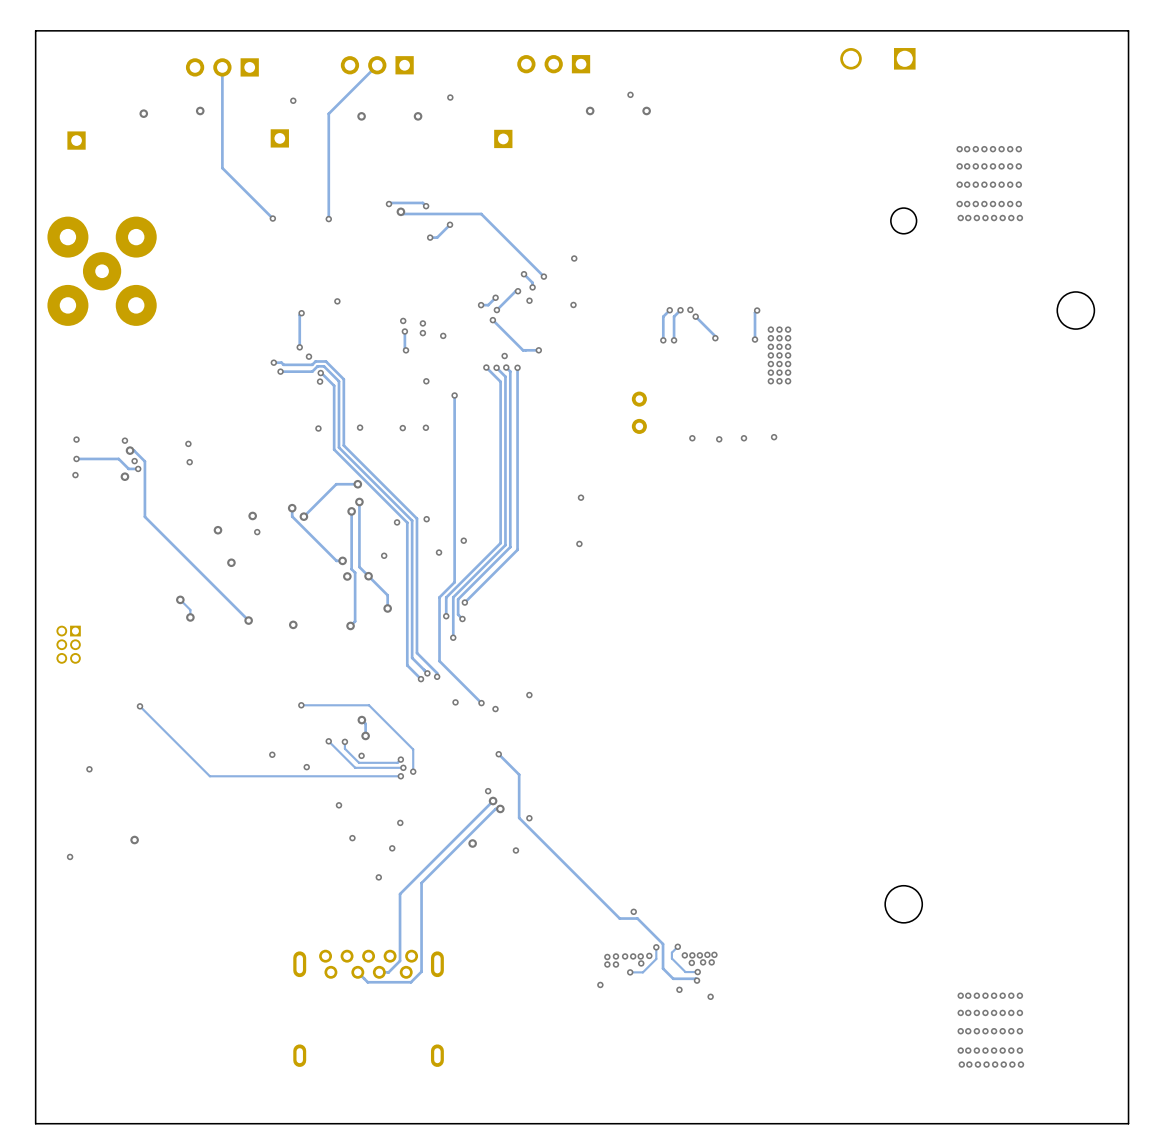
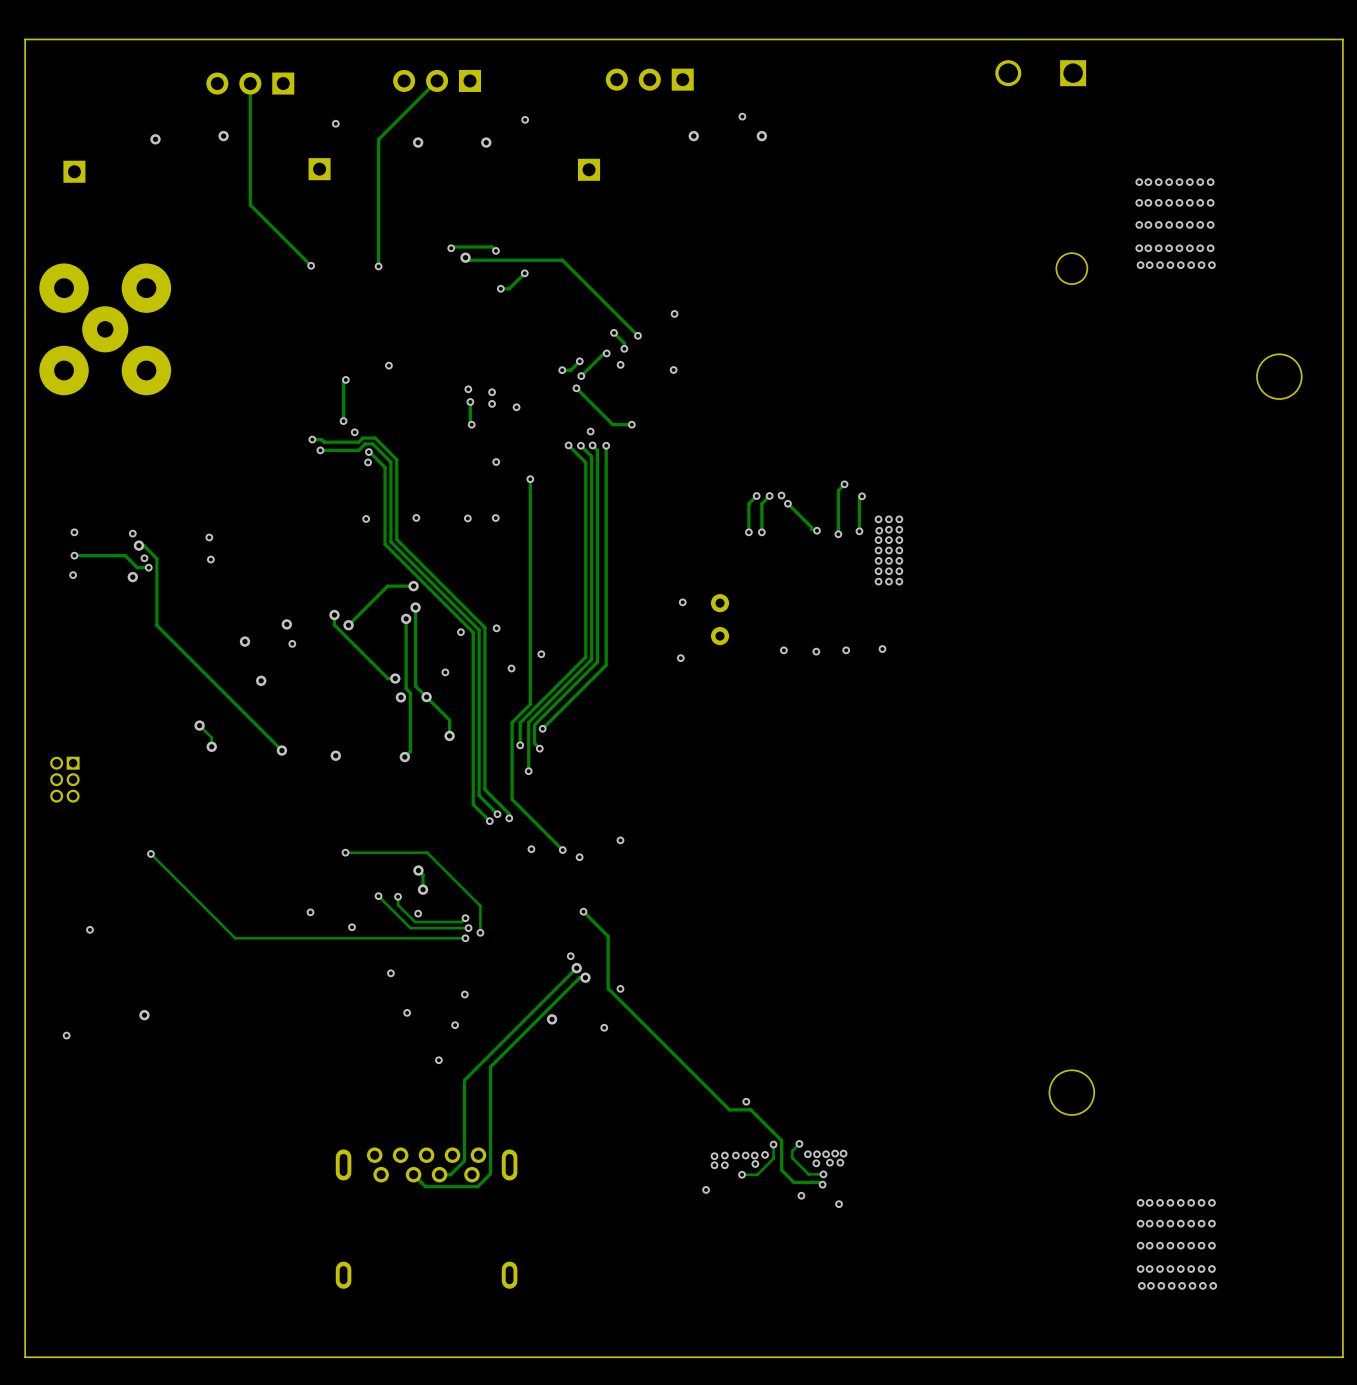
via: (690, 309) -> none
track: (669, 310) (663, 316) (663, 340) -> (756, 496) (748, 503) (748, 532)
via: (669, 310) -> none
track: (680, 310) (674, 316) (674, 340) -> (769, 496) (761, 503) (761, 532)
via: (680, 310) -> none
track: (757, 310) (755, 312) (755, 339) -> (862, 496) (859, 498) (859, 531)
via: (757, 310) -> none
track: (695, 316) (715, 338) -> (787, 503) (811, 527) (811, 529)
via: (695, 316) -> none
via: (770, 329) -> none
via: (779, 329) -> none
via: (788, 329) -> none
via: (715, 338) -> none
via: (770, 338) -> none
via: (779, 338) -> none
via: (788, 338) -> none
via: (755, 339) -> none
via: (663, 340) -> none
via: (674, 340) -> none
via: (770, 346) -> none
via: (779, 346) -> none
via: (788, 346) -> none
via: (770, 355) -> none
via: (779, 355) -> none
via: (788, 355) -> none
via: (770, 364) -> none
via: (779, 364) -> none
via: (788, 364) -> none
via: (770, 372) -> none
via: (779, 372) -> none
via: (788, 372) -> none
via: (770, 381) -> none
via: (779, 381) -> none
via: (788, 381) -> none
track: none -> (844, 484) (838, 490) (838, 534)
via: none -> (844, 484)
via: none -> (756, 496)
via: none -> (769, 496)
via: none -> (781, 495)
via: none -> (862, 496)
part position: (639, 412) -> (720, 619)
via: none -> (787, 503)
via: none -> (878, 519)
via: none -> (888, 519)
via: none -> (899, 519)
via: none -> (888, 529)
via: none -> (899, 529)
via: (774, 437) -> none
via: none -> (859, 531)
via: none -> (748, 532)
via: none -> (761, 532)
via: (719, 439) -> none
via: none -> (838, 534)
via: none -> (878, 540)
via: none -> (888, 540)
via: none -> (899, 540)
via: none -> (878, 550)
via: none -> (888, 550)
via: none -> (899, 550)
via: none -> (878, 560)
via: none -> (888, 560)
via: none -> (899, 560)
via: none -> (878, 571)
via: none -> (888, 571)
via: none -> (899, 571)
via: none -> (878, 581)
via: none -> (888, 581)
via: none -> (899, 581)
via: none -> (882, 649)
via: none -> (783, 650)
via: none -> (846, 650)
via: none -> (816, 651)

